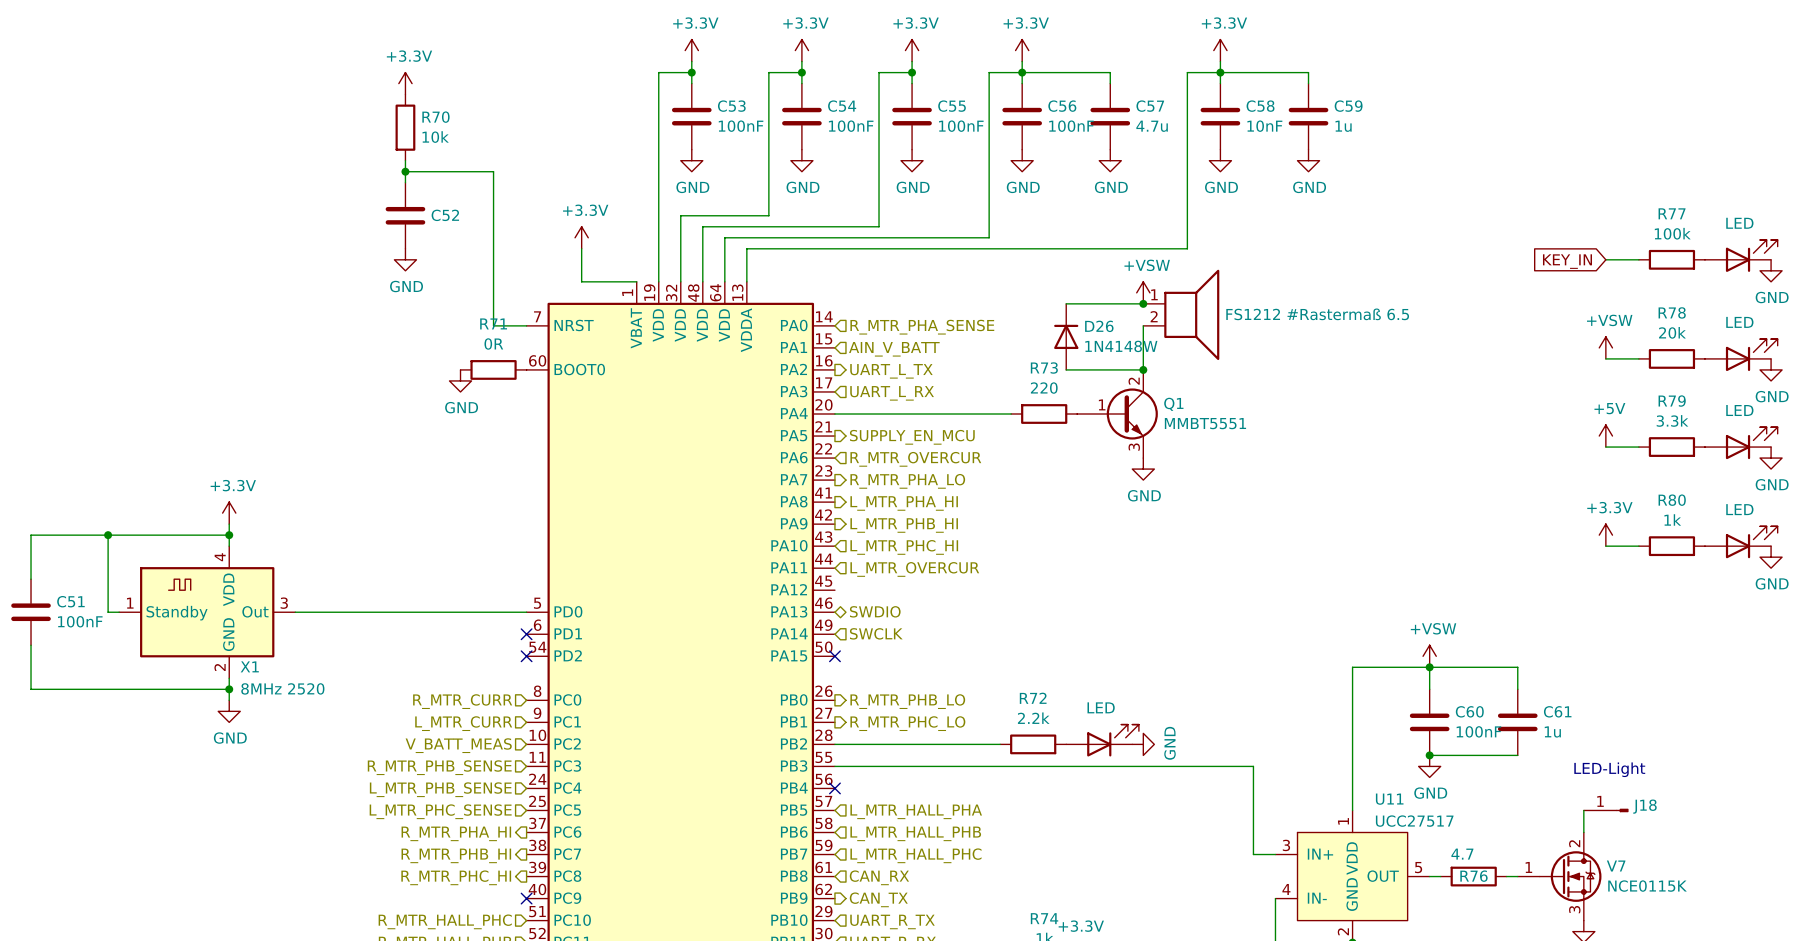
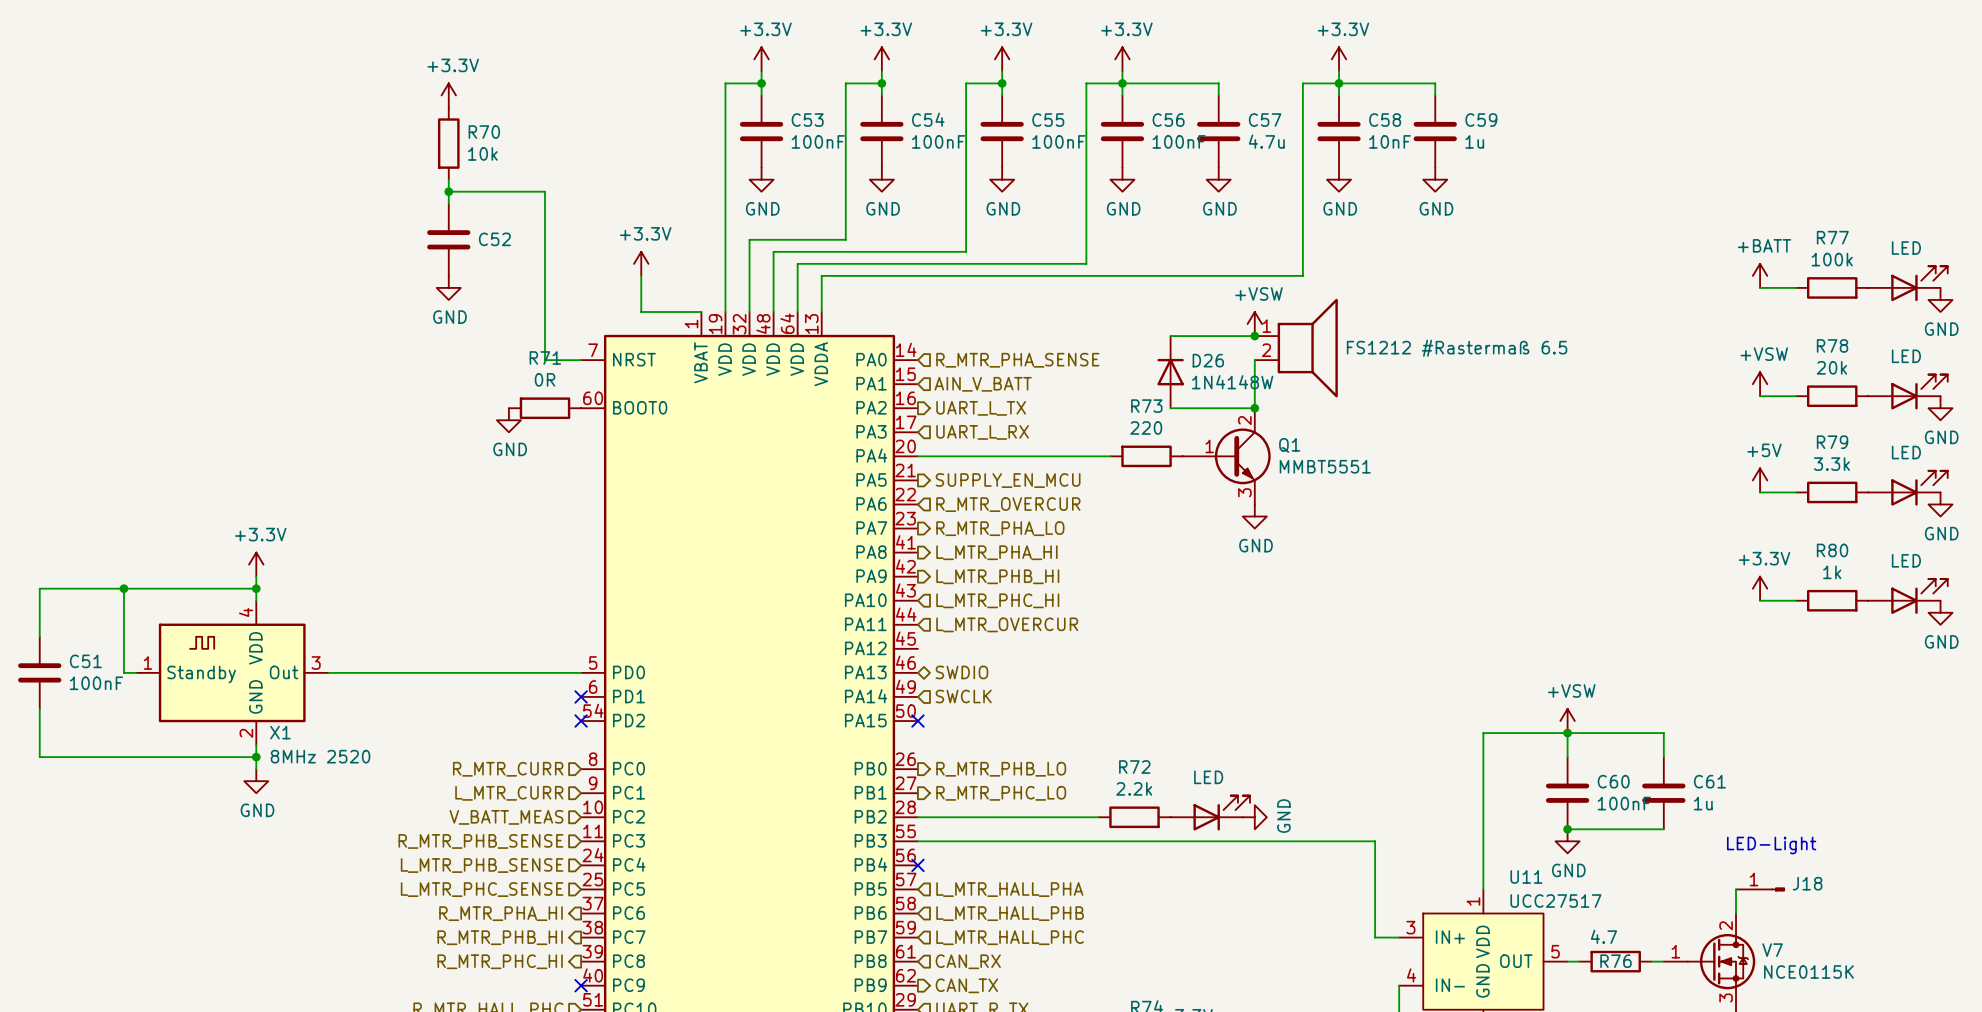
power symbol: none -> +BATT (1760, 275)
global label: KEY_IN (1567, 261) -> none

